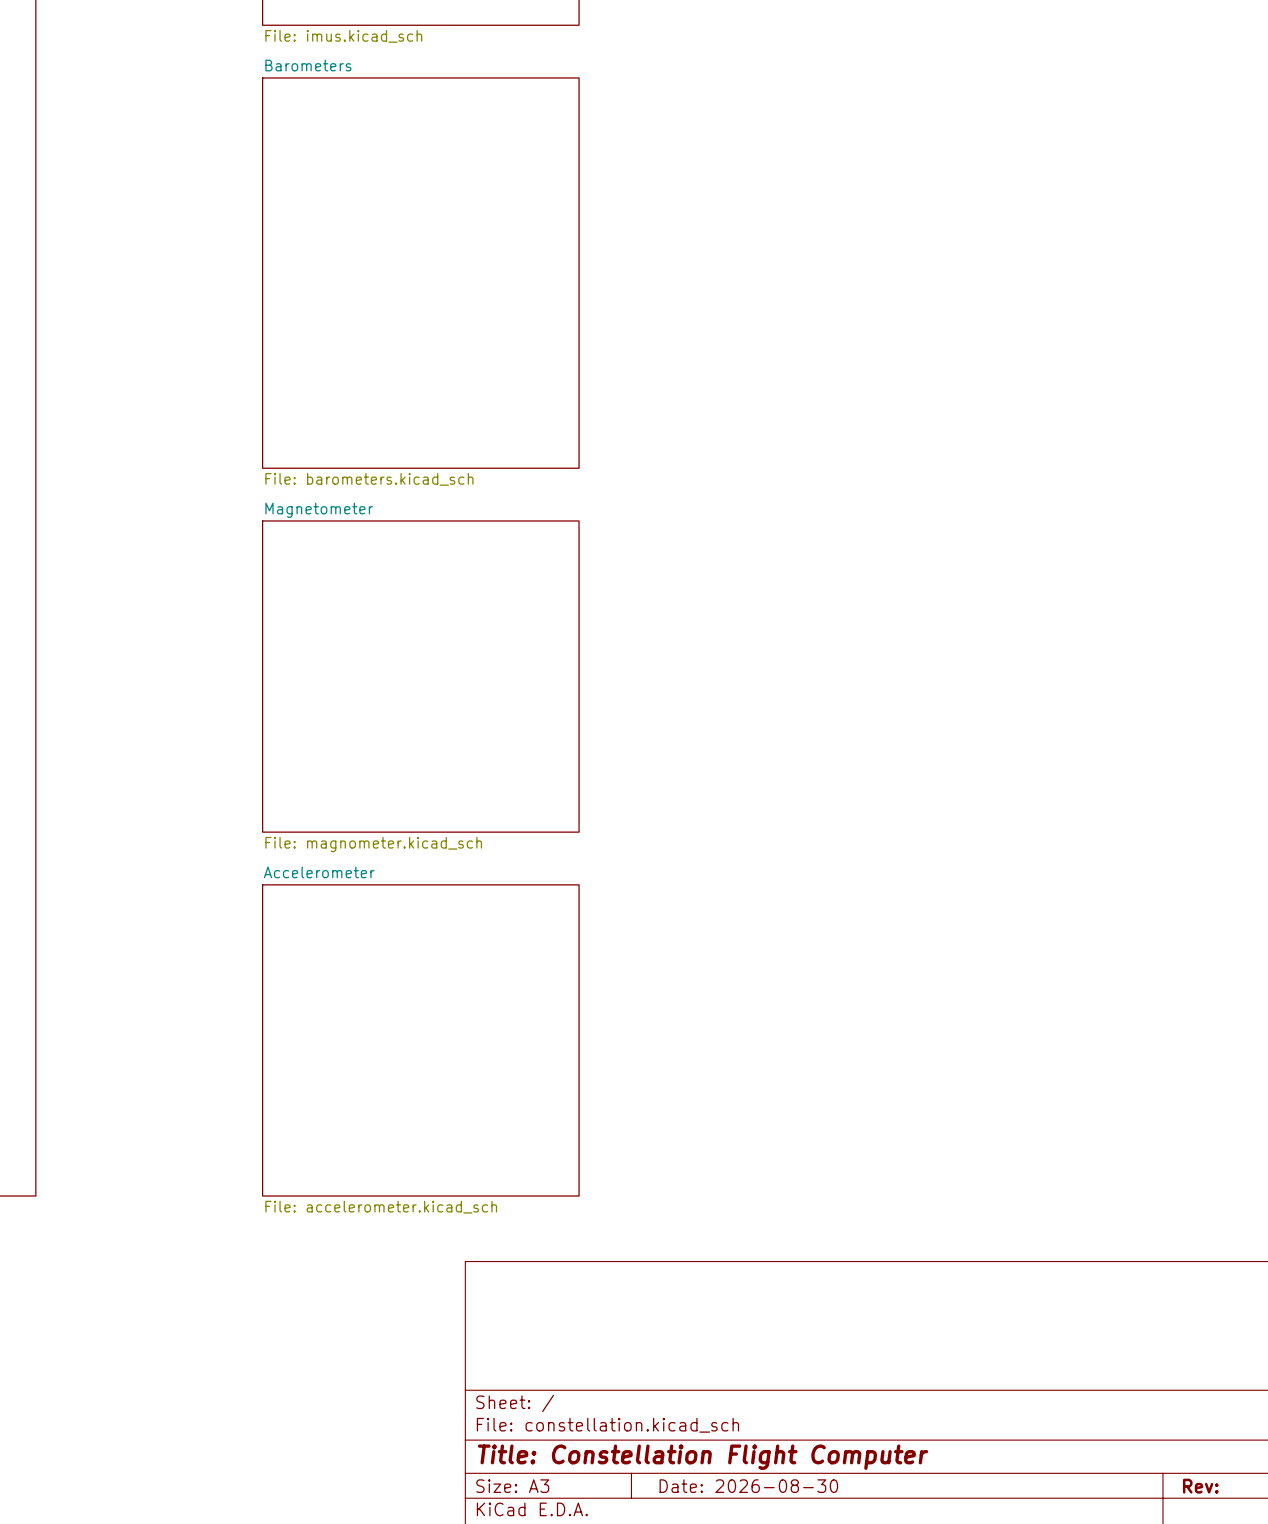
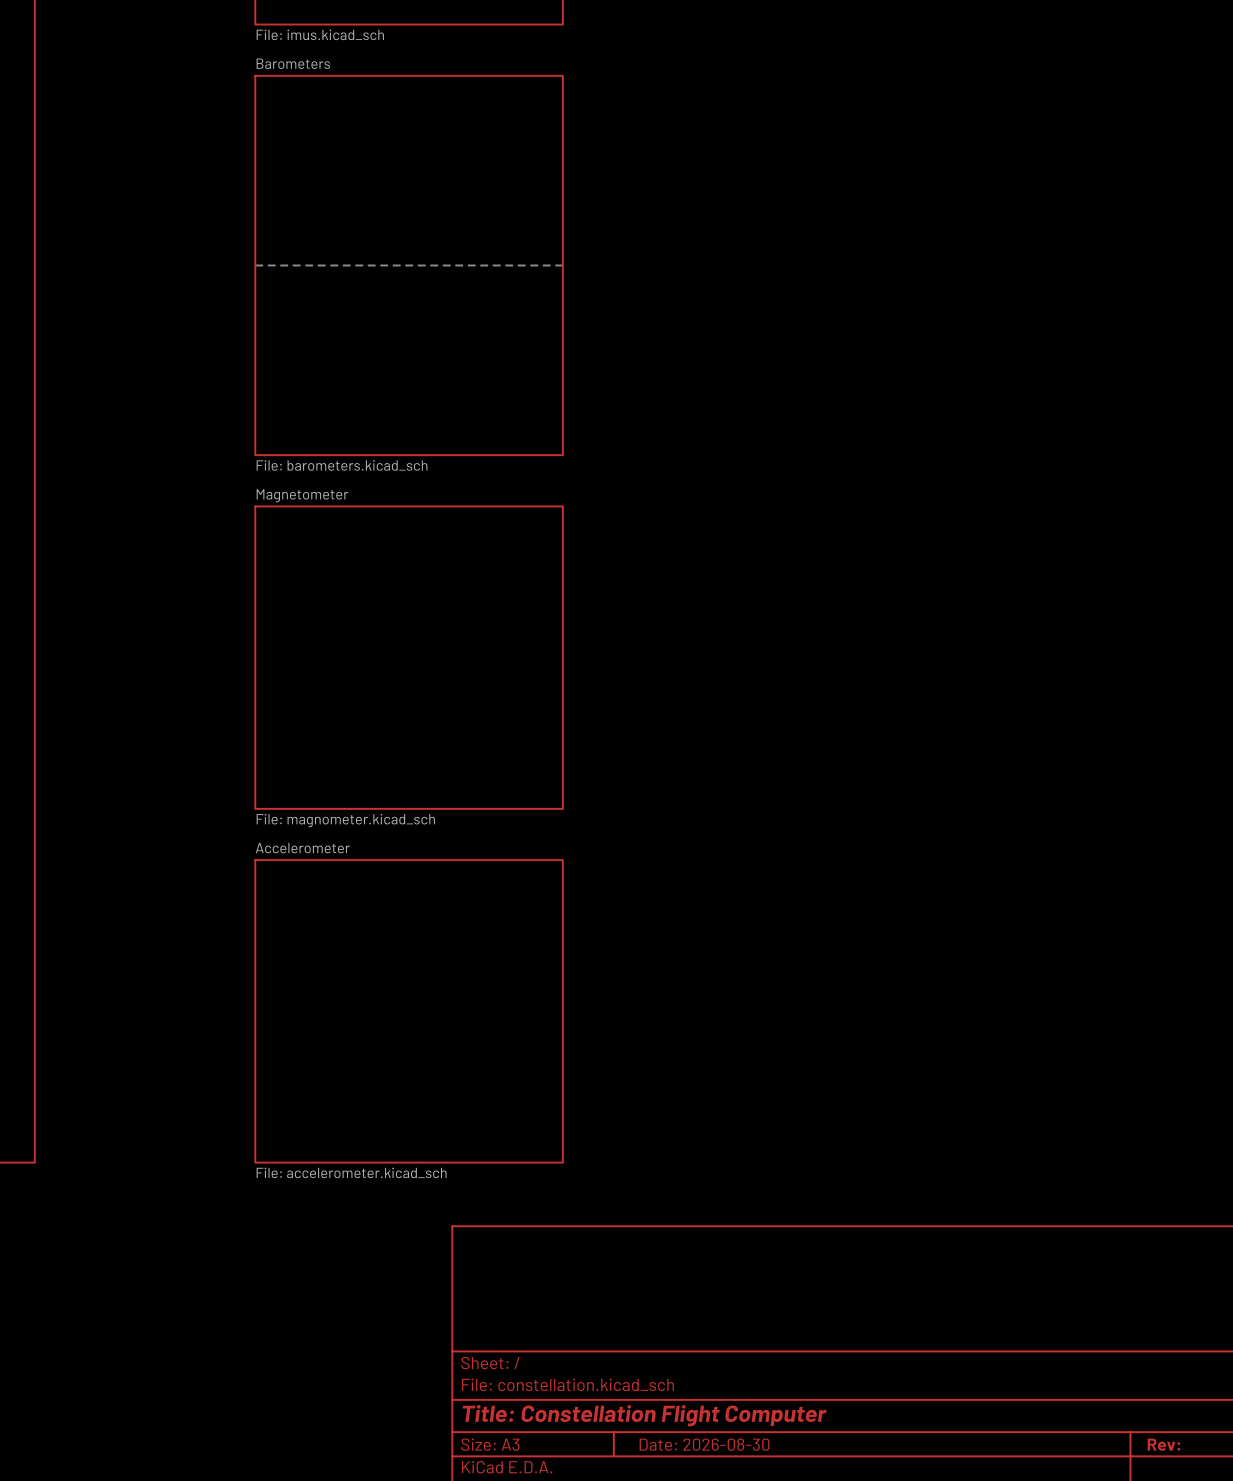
line: none -> (255, 265) (562, 265)

